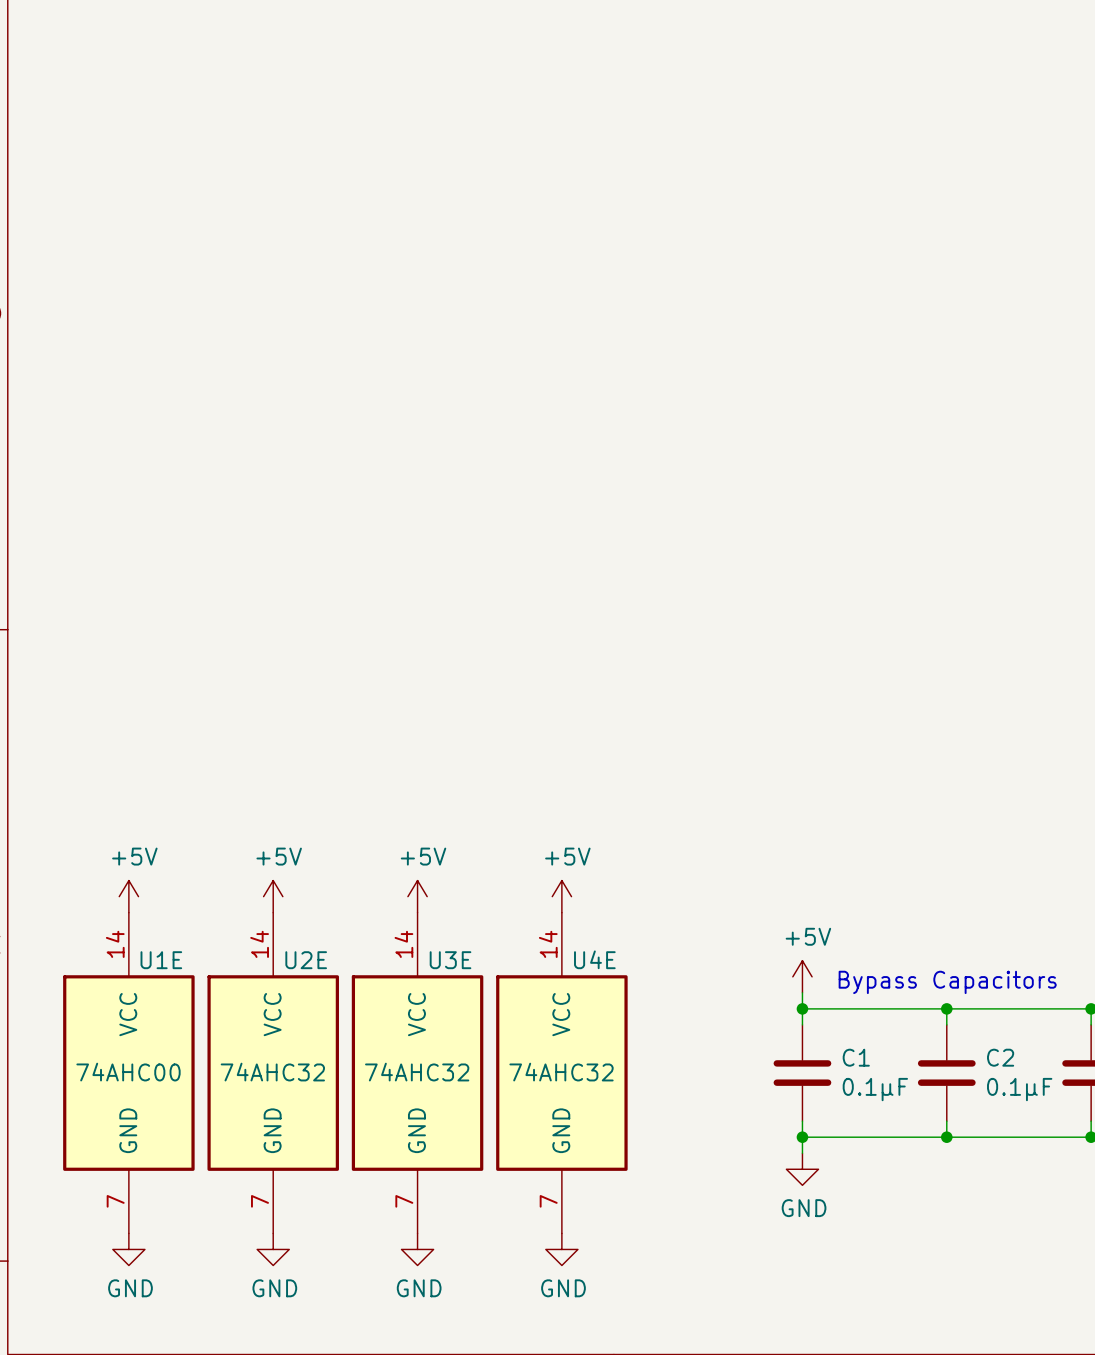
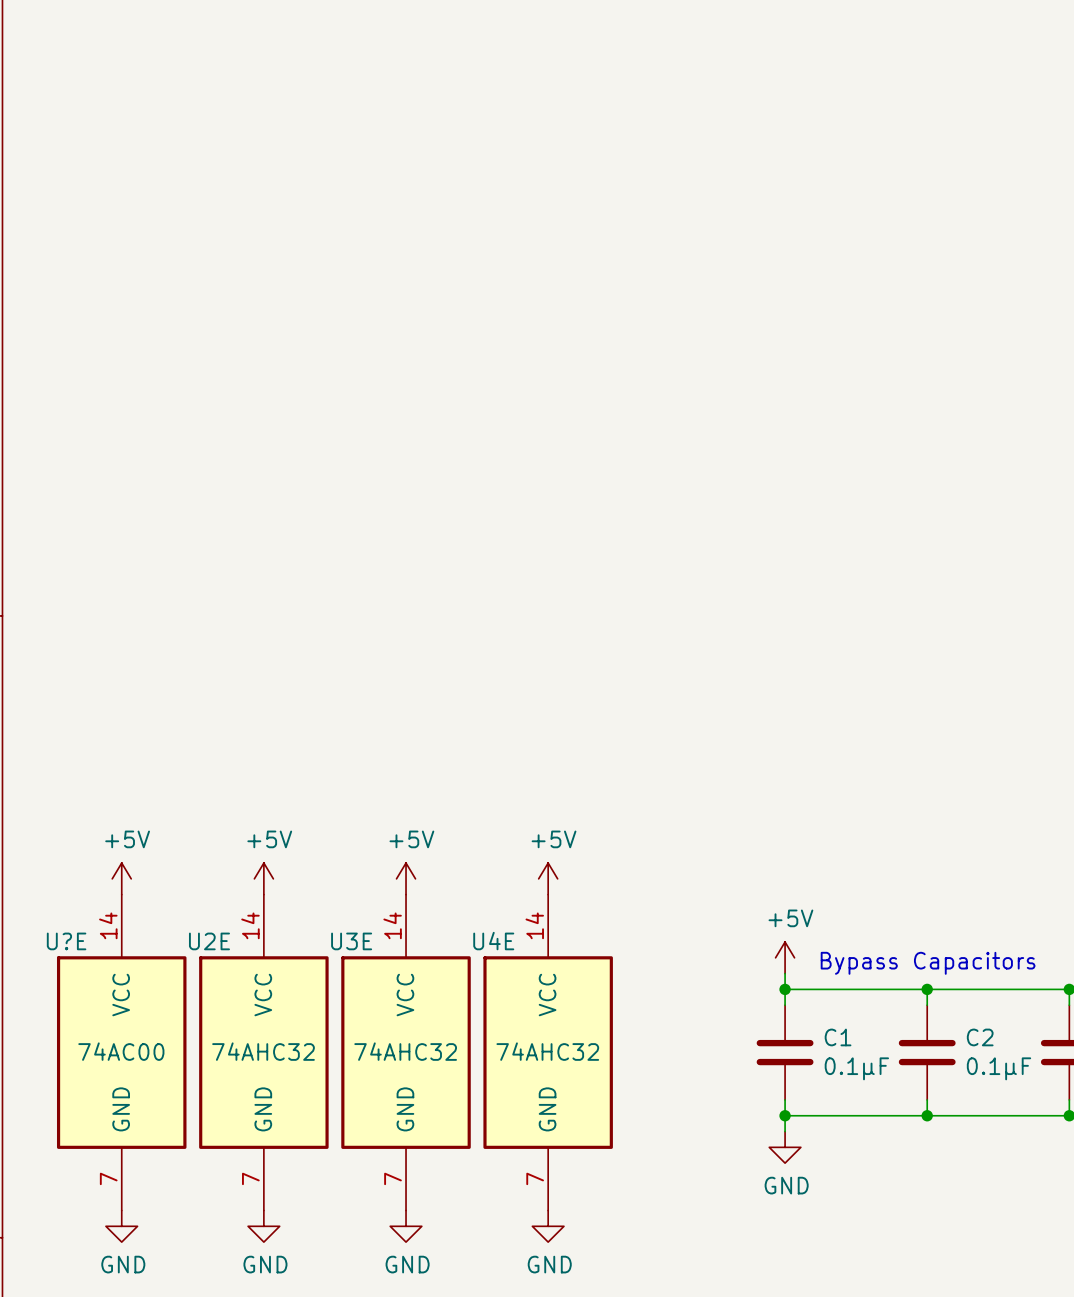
U4E name position: U4E (594, 959) -> U4E (493, 941)
U1E name: U1E (161, 960) -> U?E (66, 941)
U2E name position: U2E (306, 960) -> U2E (209, 941)
U3E name position: U3E (450, 960) -> U3E (351, 941)
U1E value: 74AHC00 (128, 1072) -> 74AC00 (121, 1051)

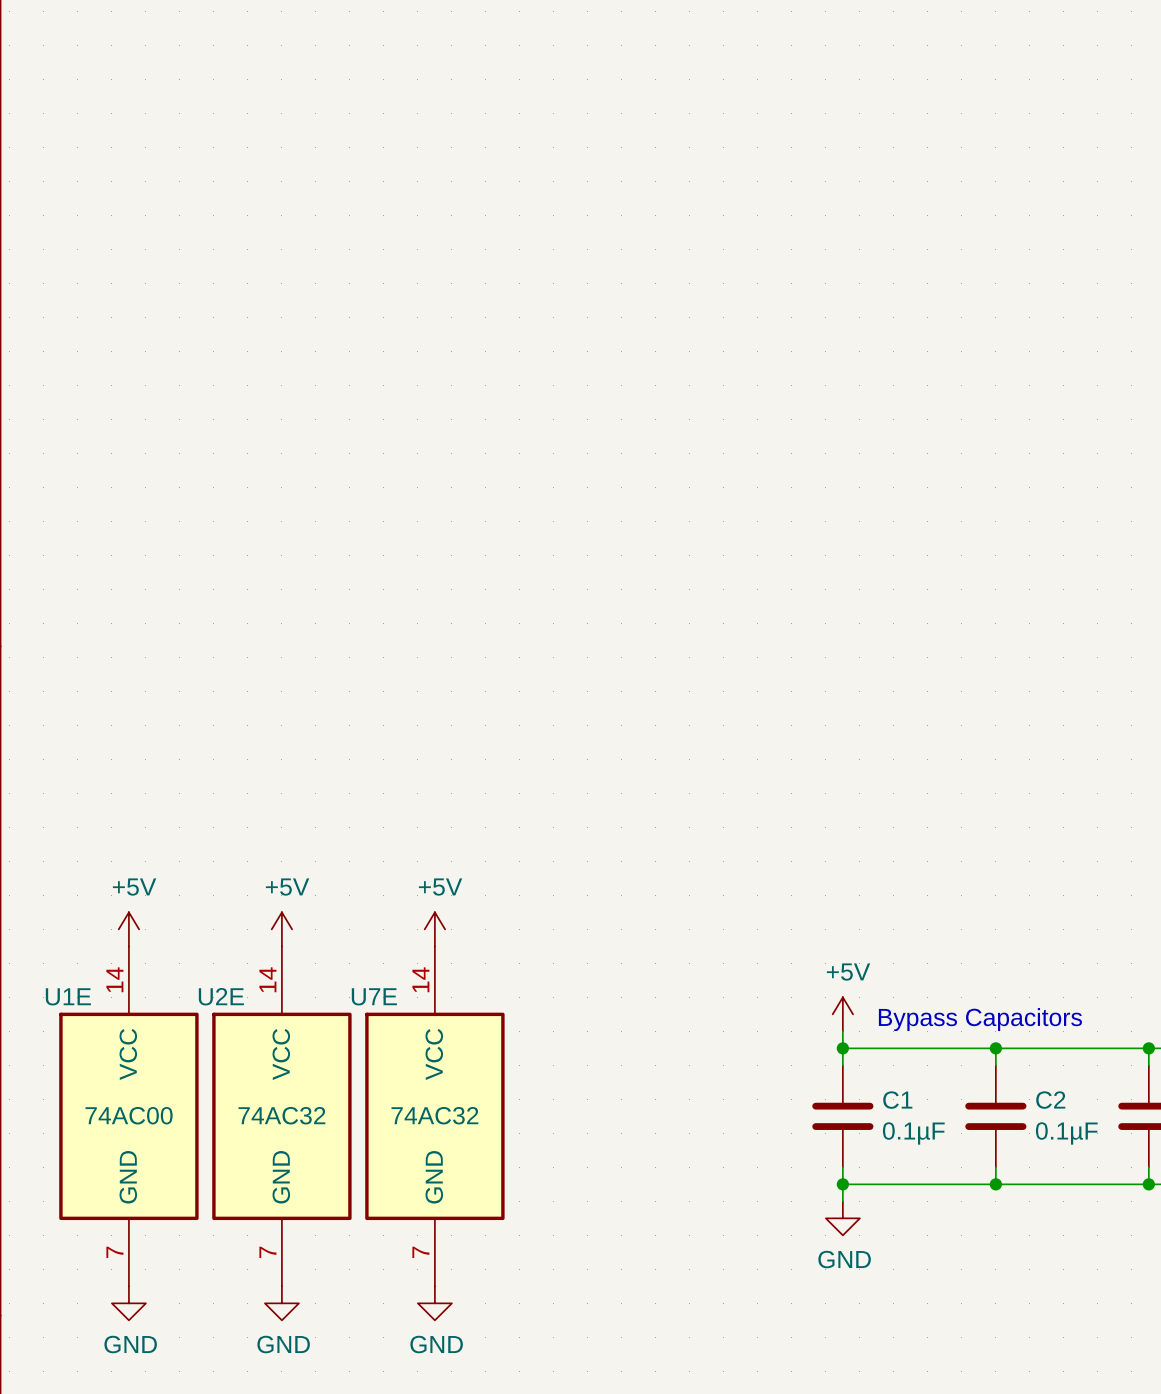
power symbol: +5V (548, 878) -> none
U?E name: U?E (66, 941) -> U1E (68, 996)
U3E name: U3E (351, 941) -> U7E (374, 996)
U2E value: 74AHC32 (263, 1051) -> 74AC32 (281, 1115)
U3E value: 74AHC32 (405, 1051) -> 74AC32 (434, 1115)
U4E: 74AHC32 (548, 1052) -> none
power symbol: GND (548, 1226) -> none

